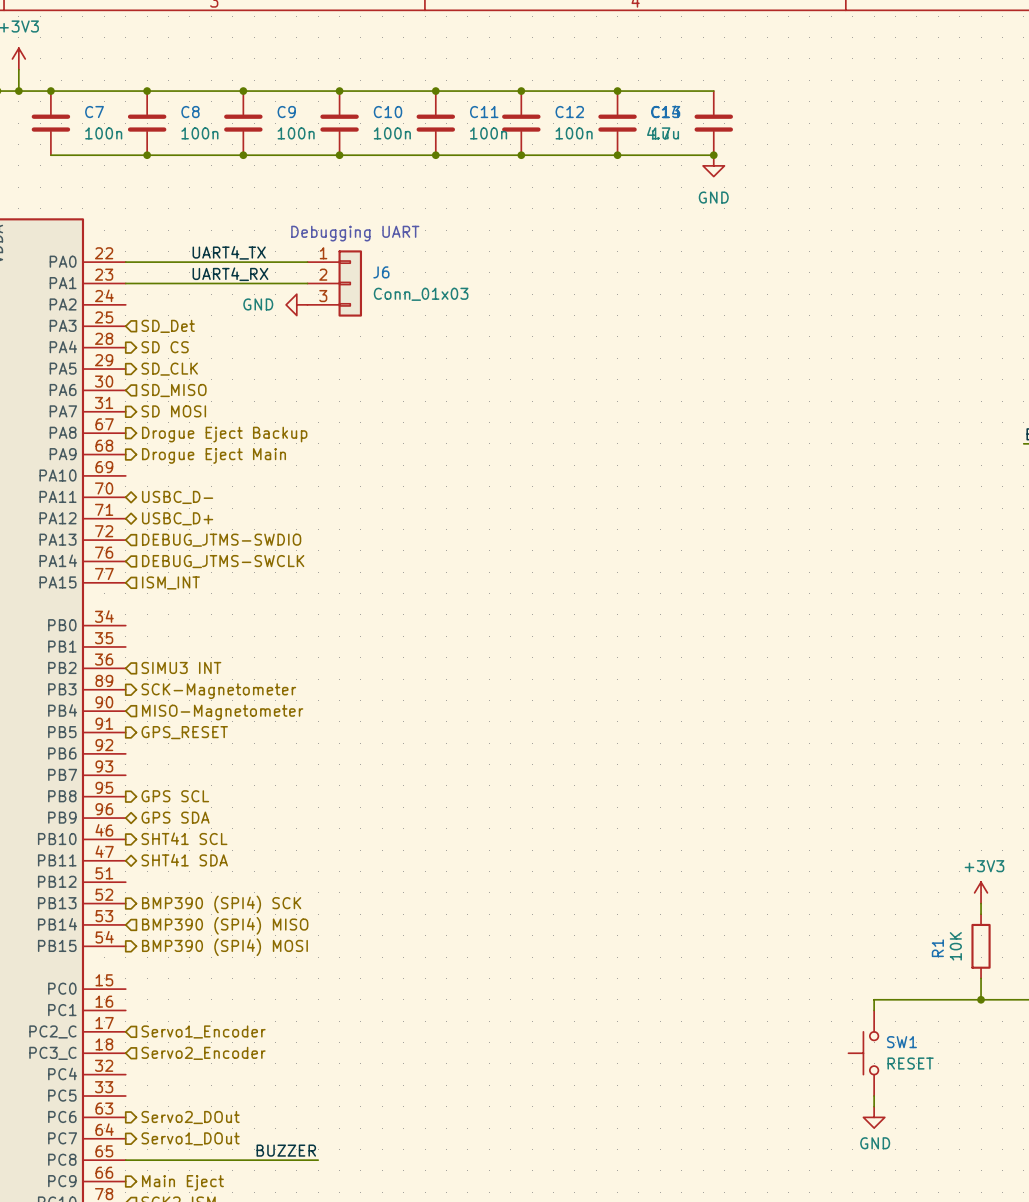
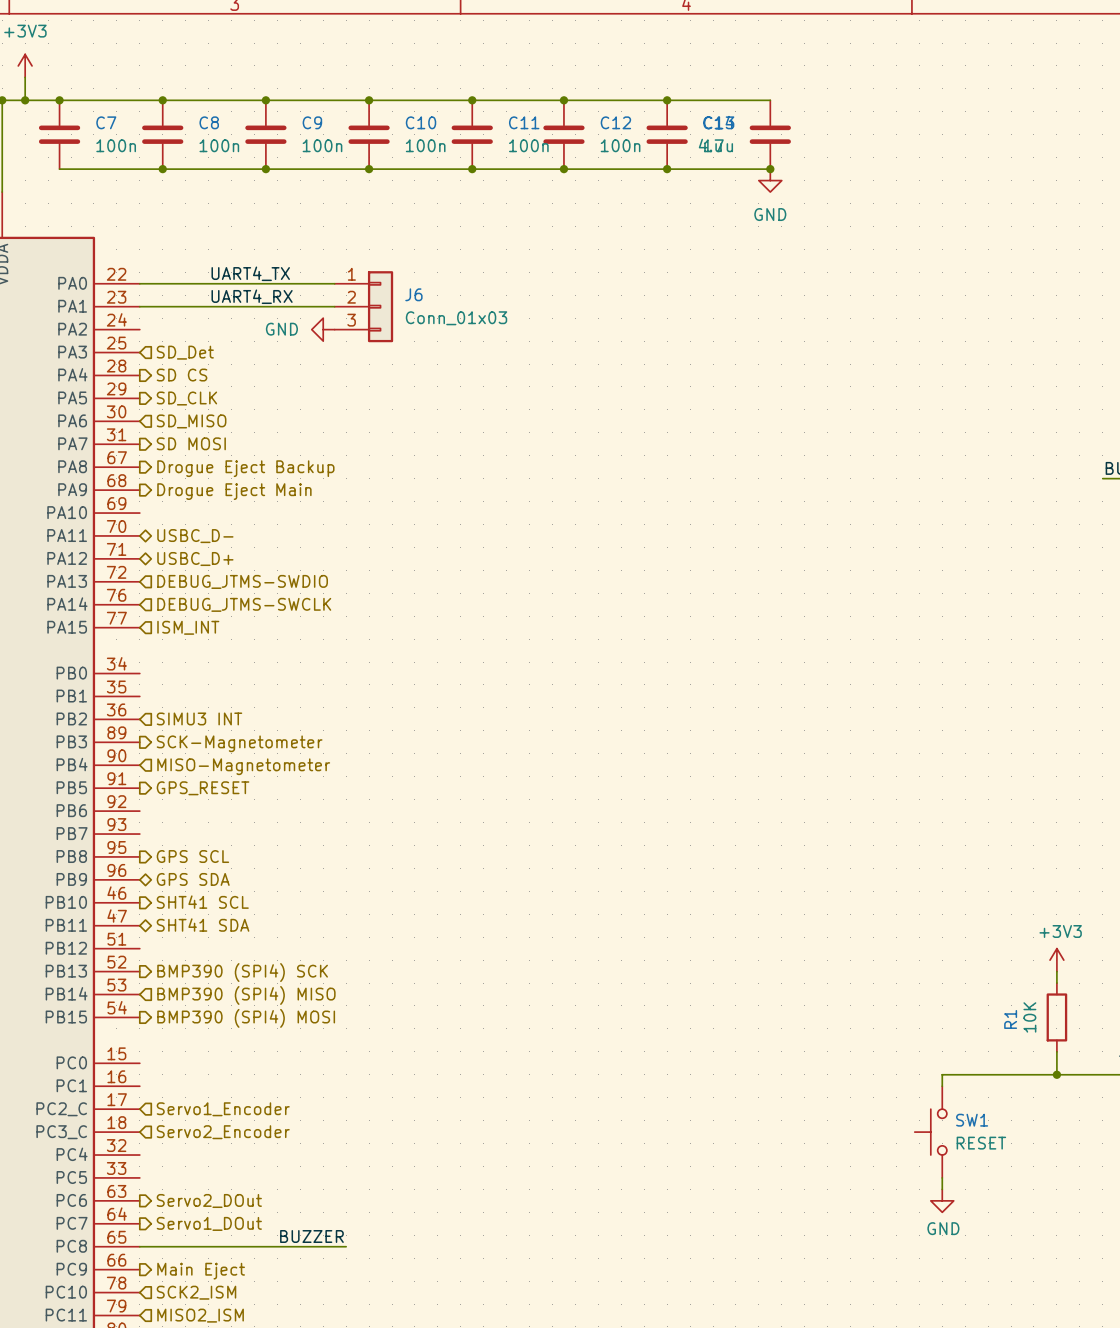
text: Debugging UART (355, 233) -> none

